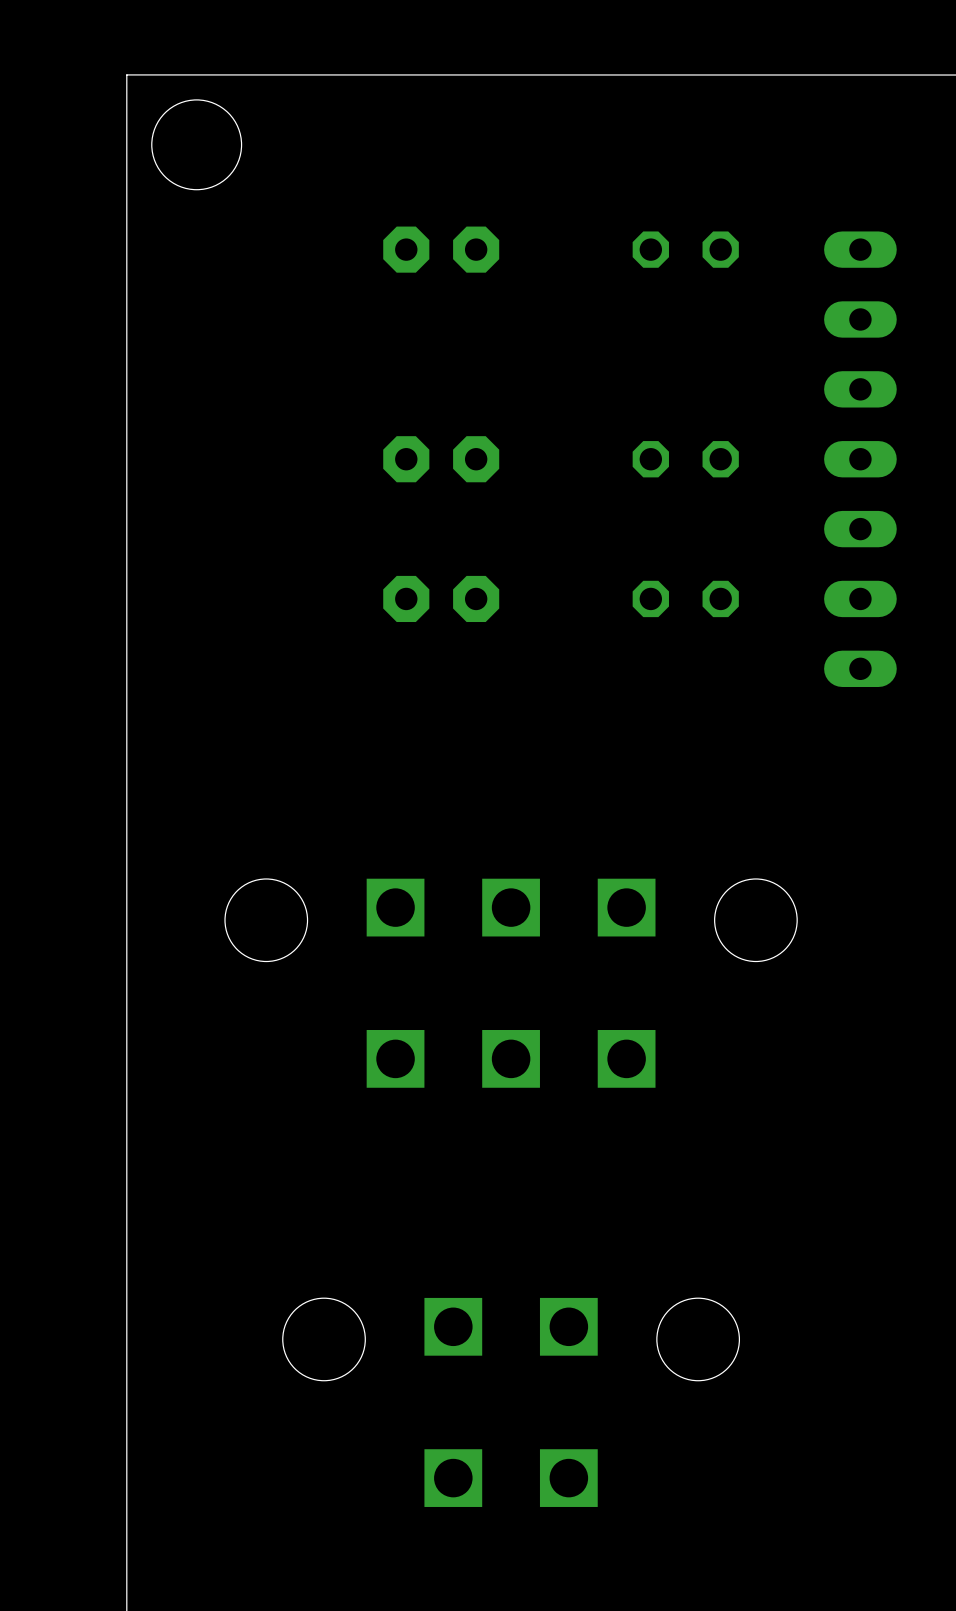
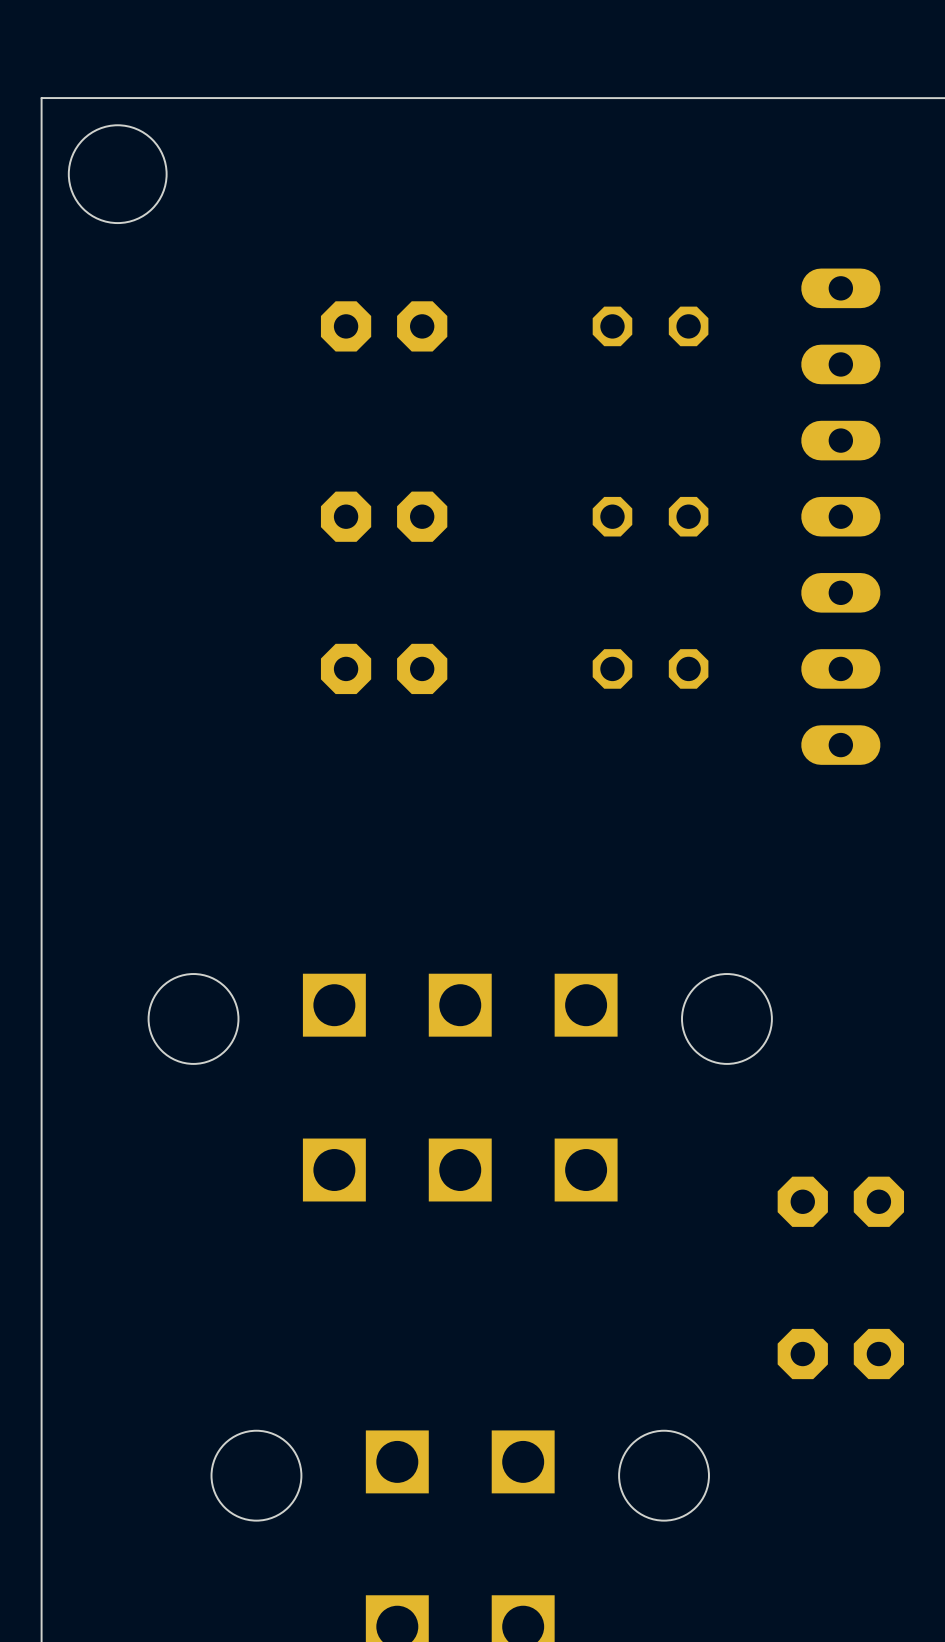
part position: (441, 249) -> (384, 326)
part position: (685, 249) -> (650, 326)
part: none -> (840, 1201)
part: none -> (840, 1354)

